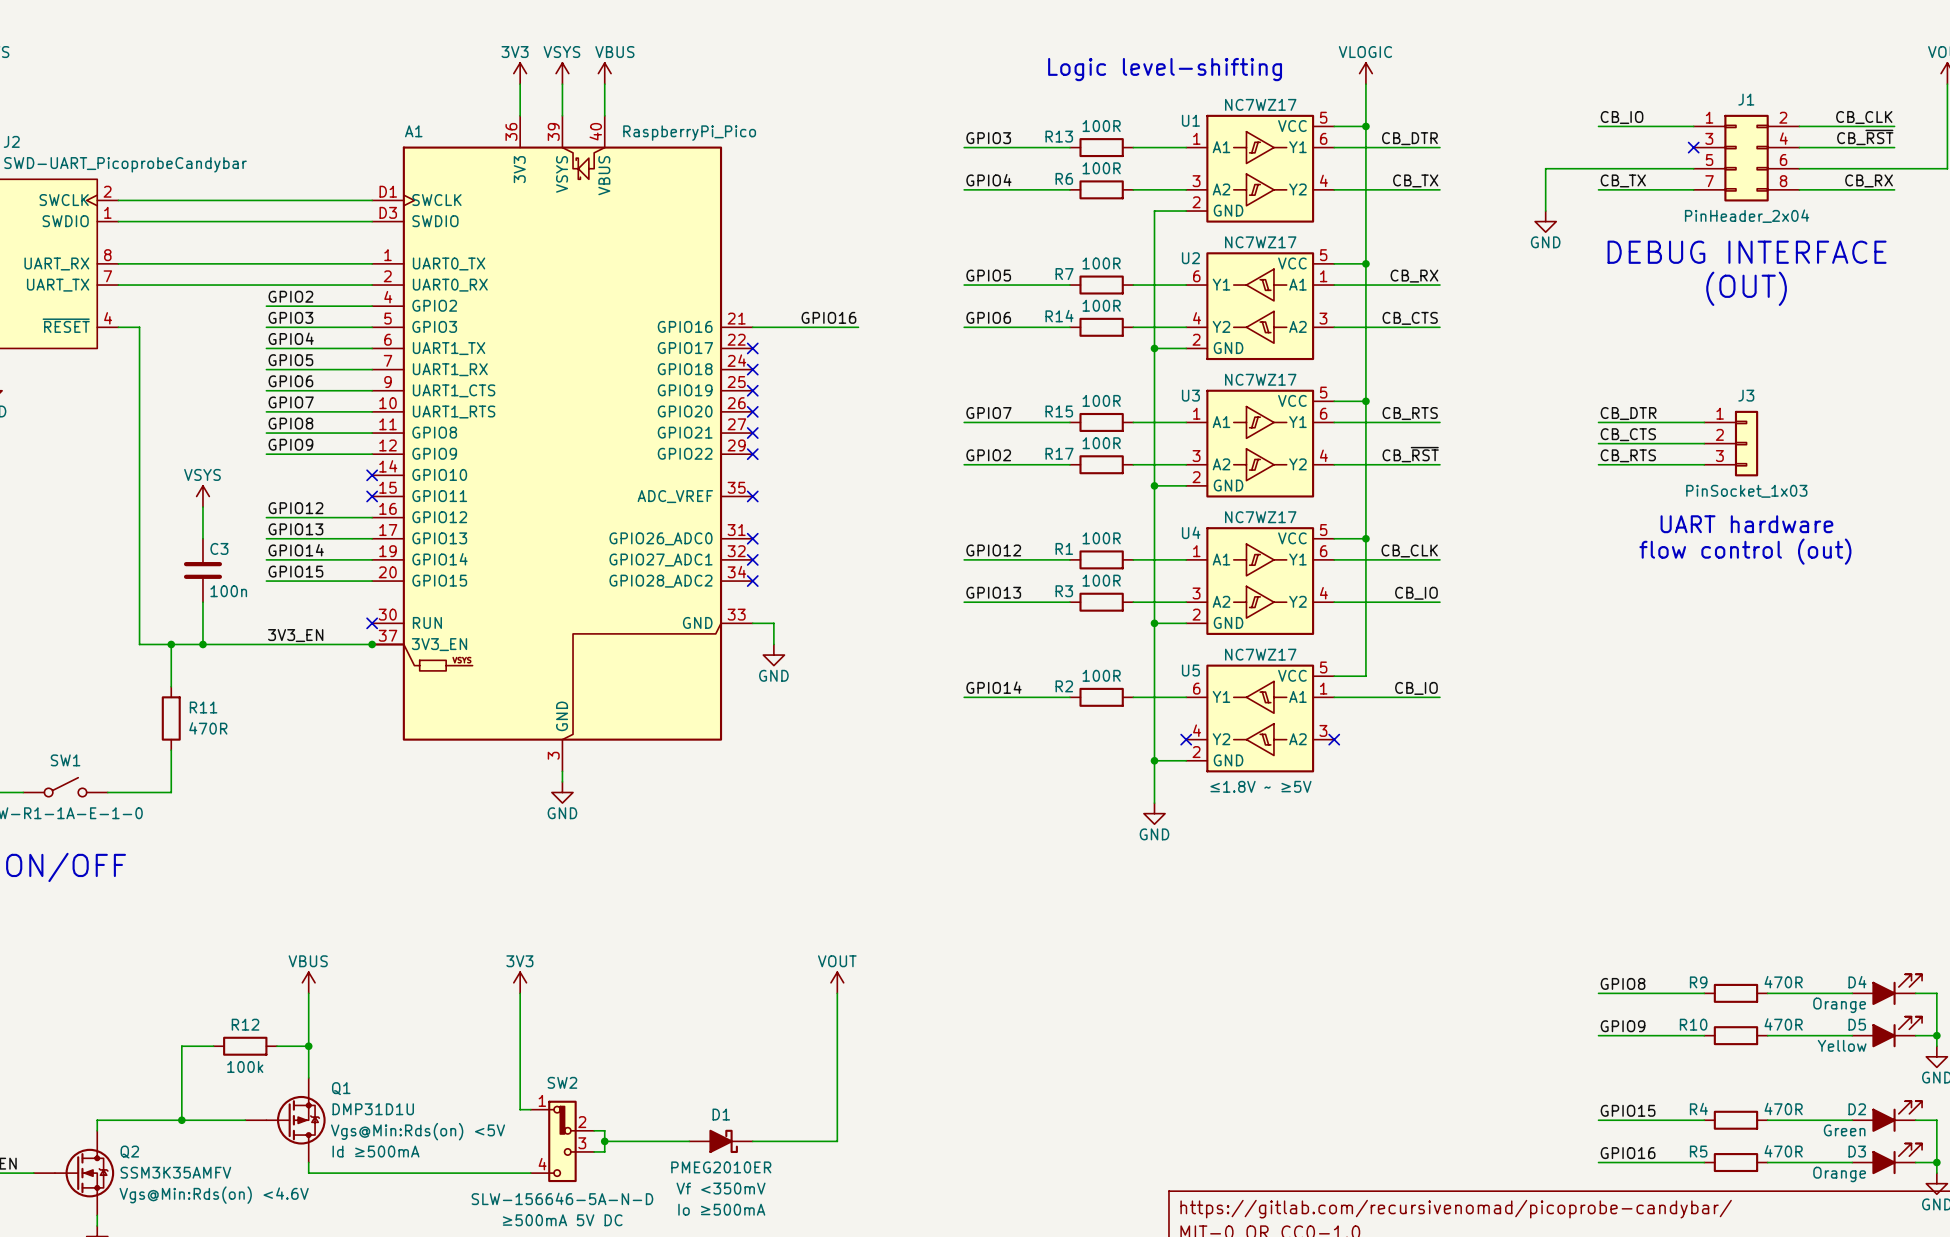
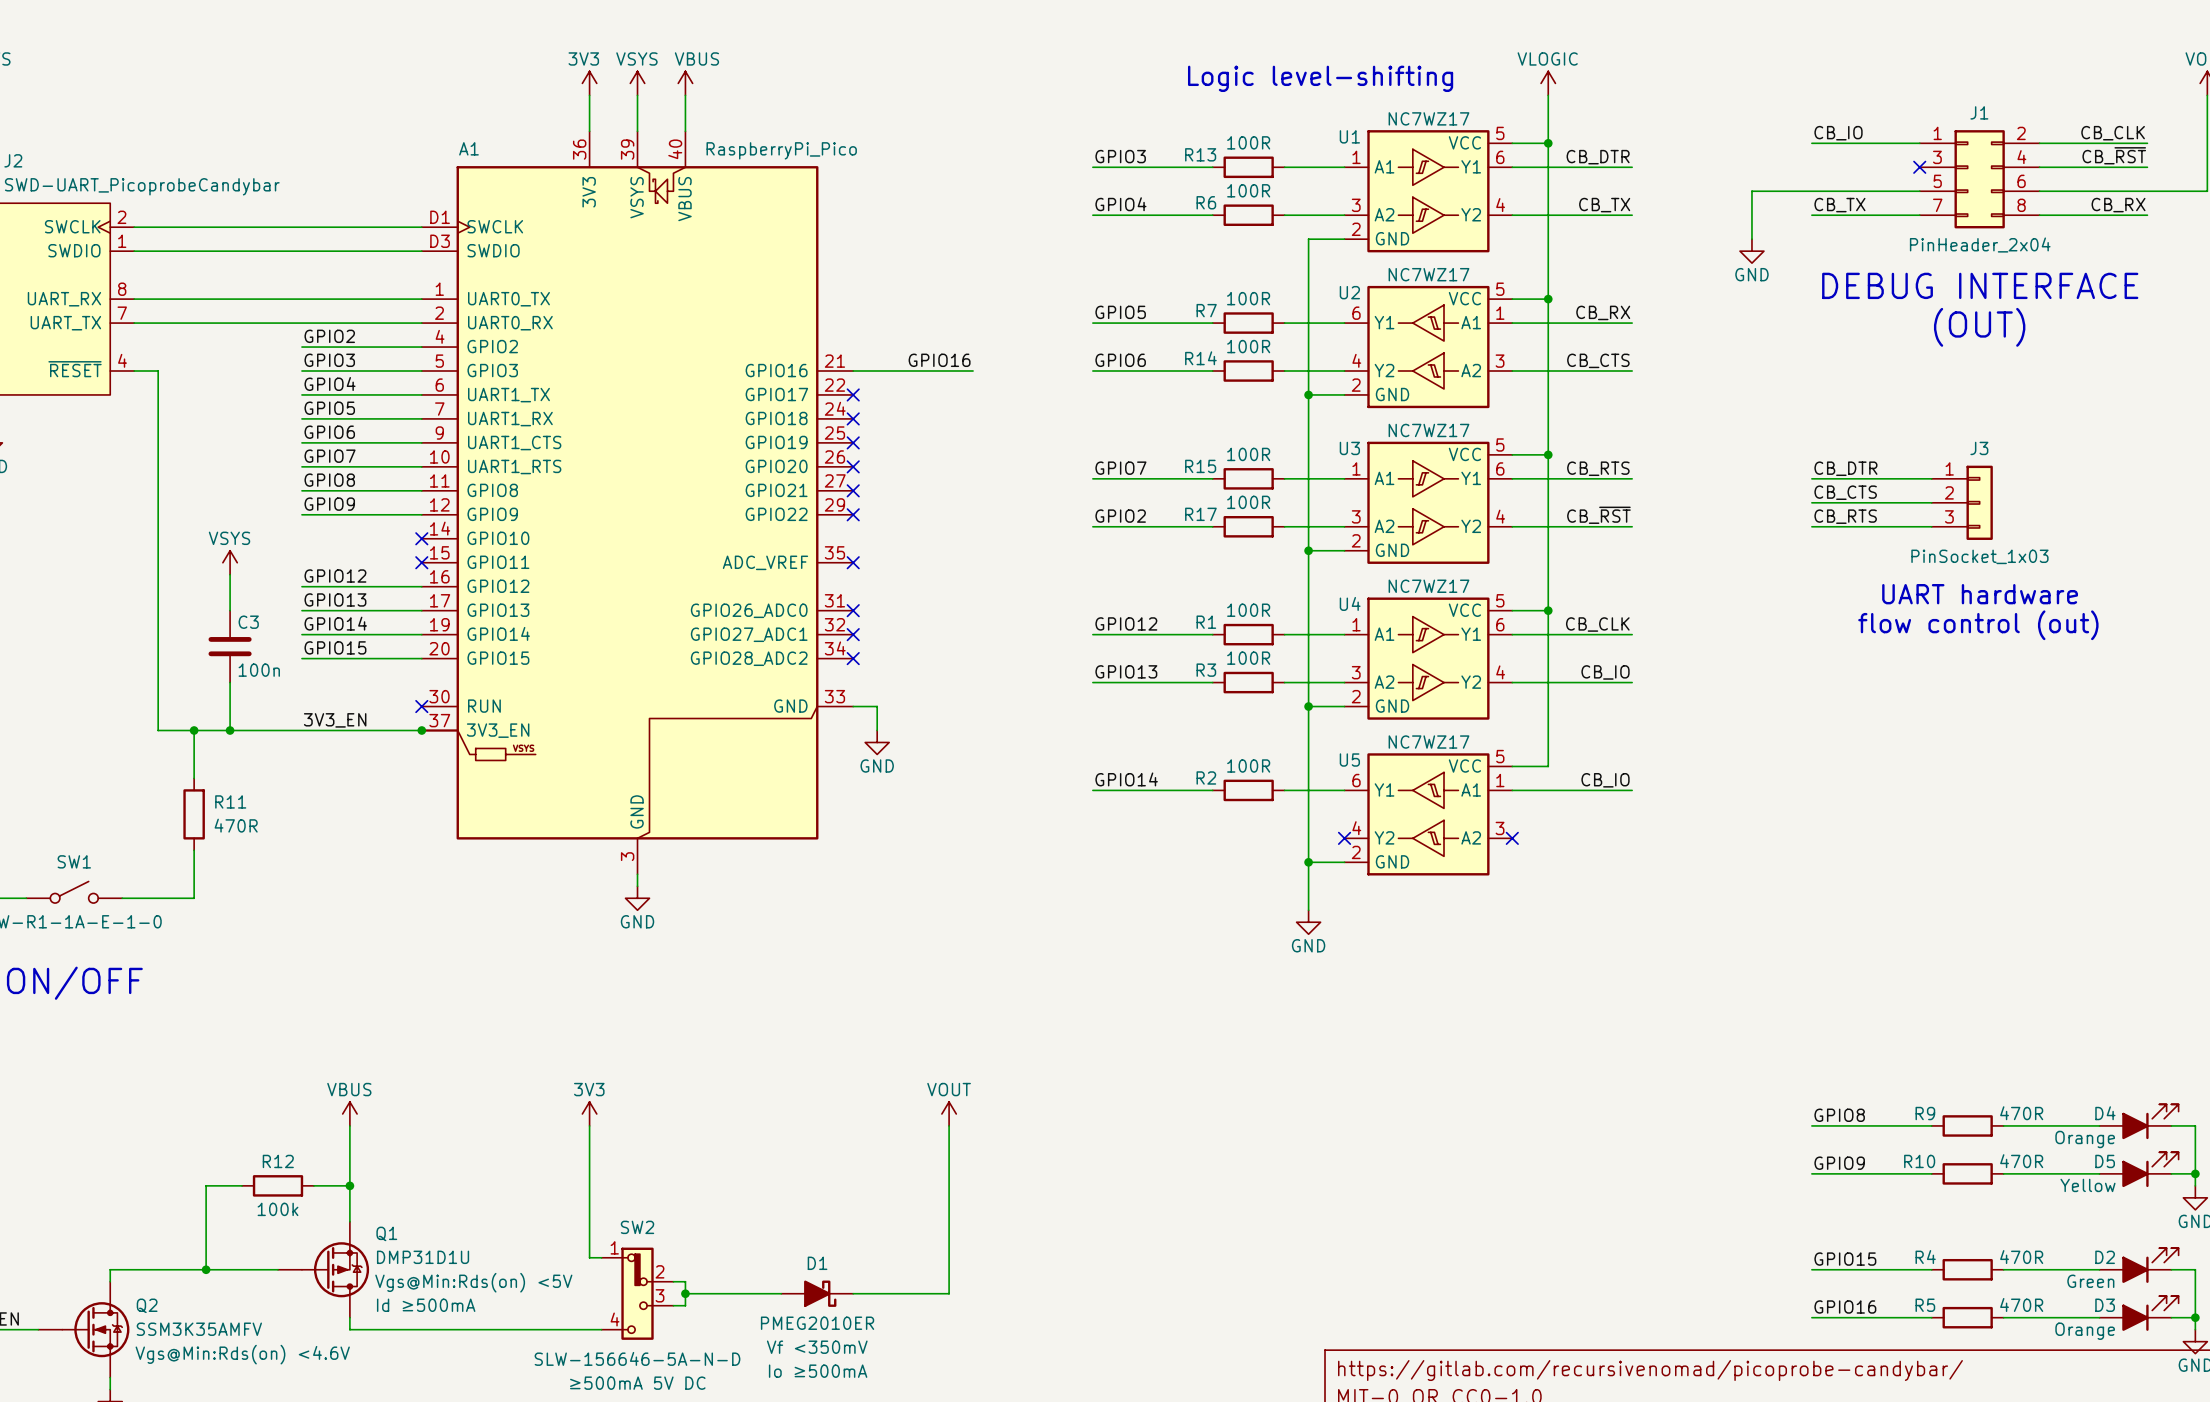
U5 text: ≤1.8V ~ ≥5V (1260, 786) -> none

